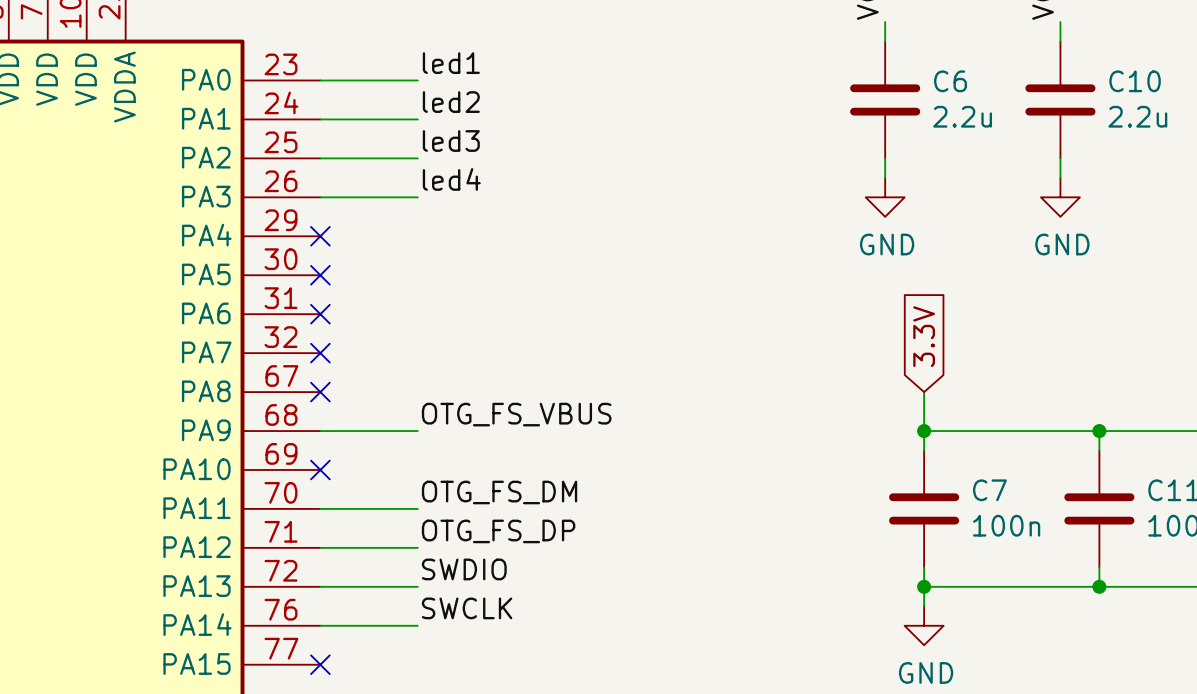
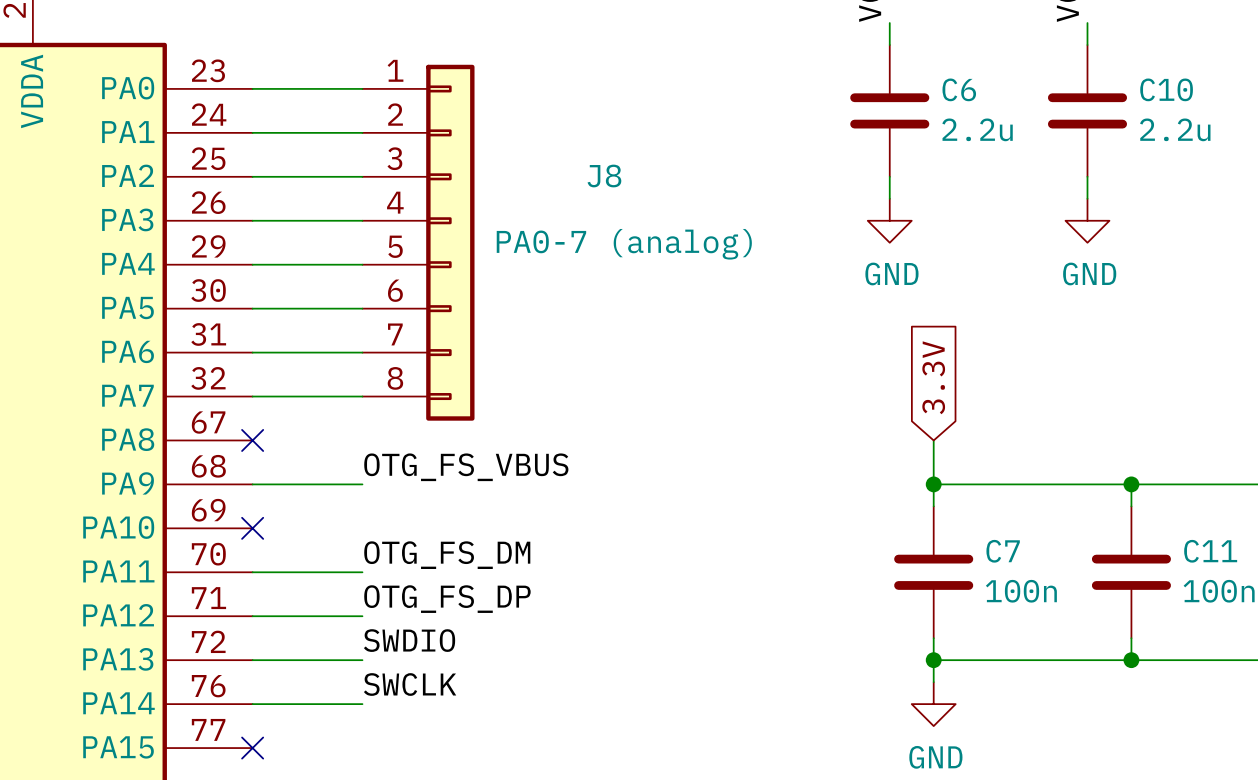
label: led1 (451, 63) -> none
label: led2 (451, 102) -> none
label: led3 (451, 141) -> none
label: led4 (451, 179) -> none
J8: none -> PA0-7 (analog) (418, 242)
wire: none -> (252, 264) (362, 264)
no-connect mark: (320, 236) -> none
wire: none -> (252, 308) (362, 308)
no-connect mark: (320, 275) -> none
wire: none -> (252, 352) (362, 352)
no-connect mark: (320, 314) -> none
wire: none -> (252, 396) (362, 396)
no-connect mark: (320, 353) -> none

